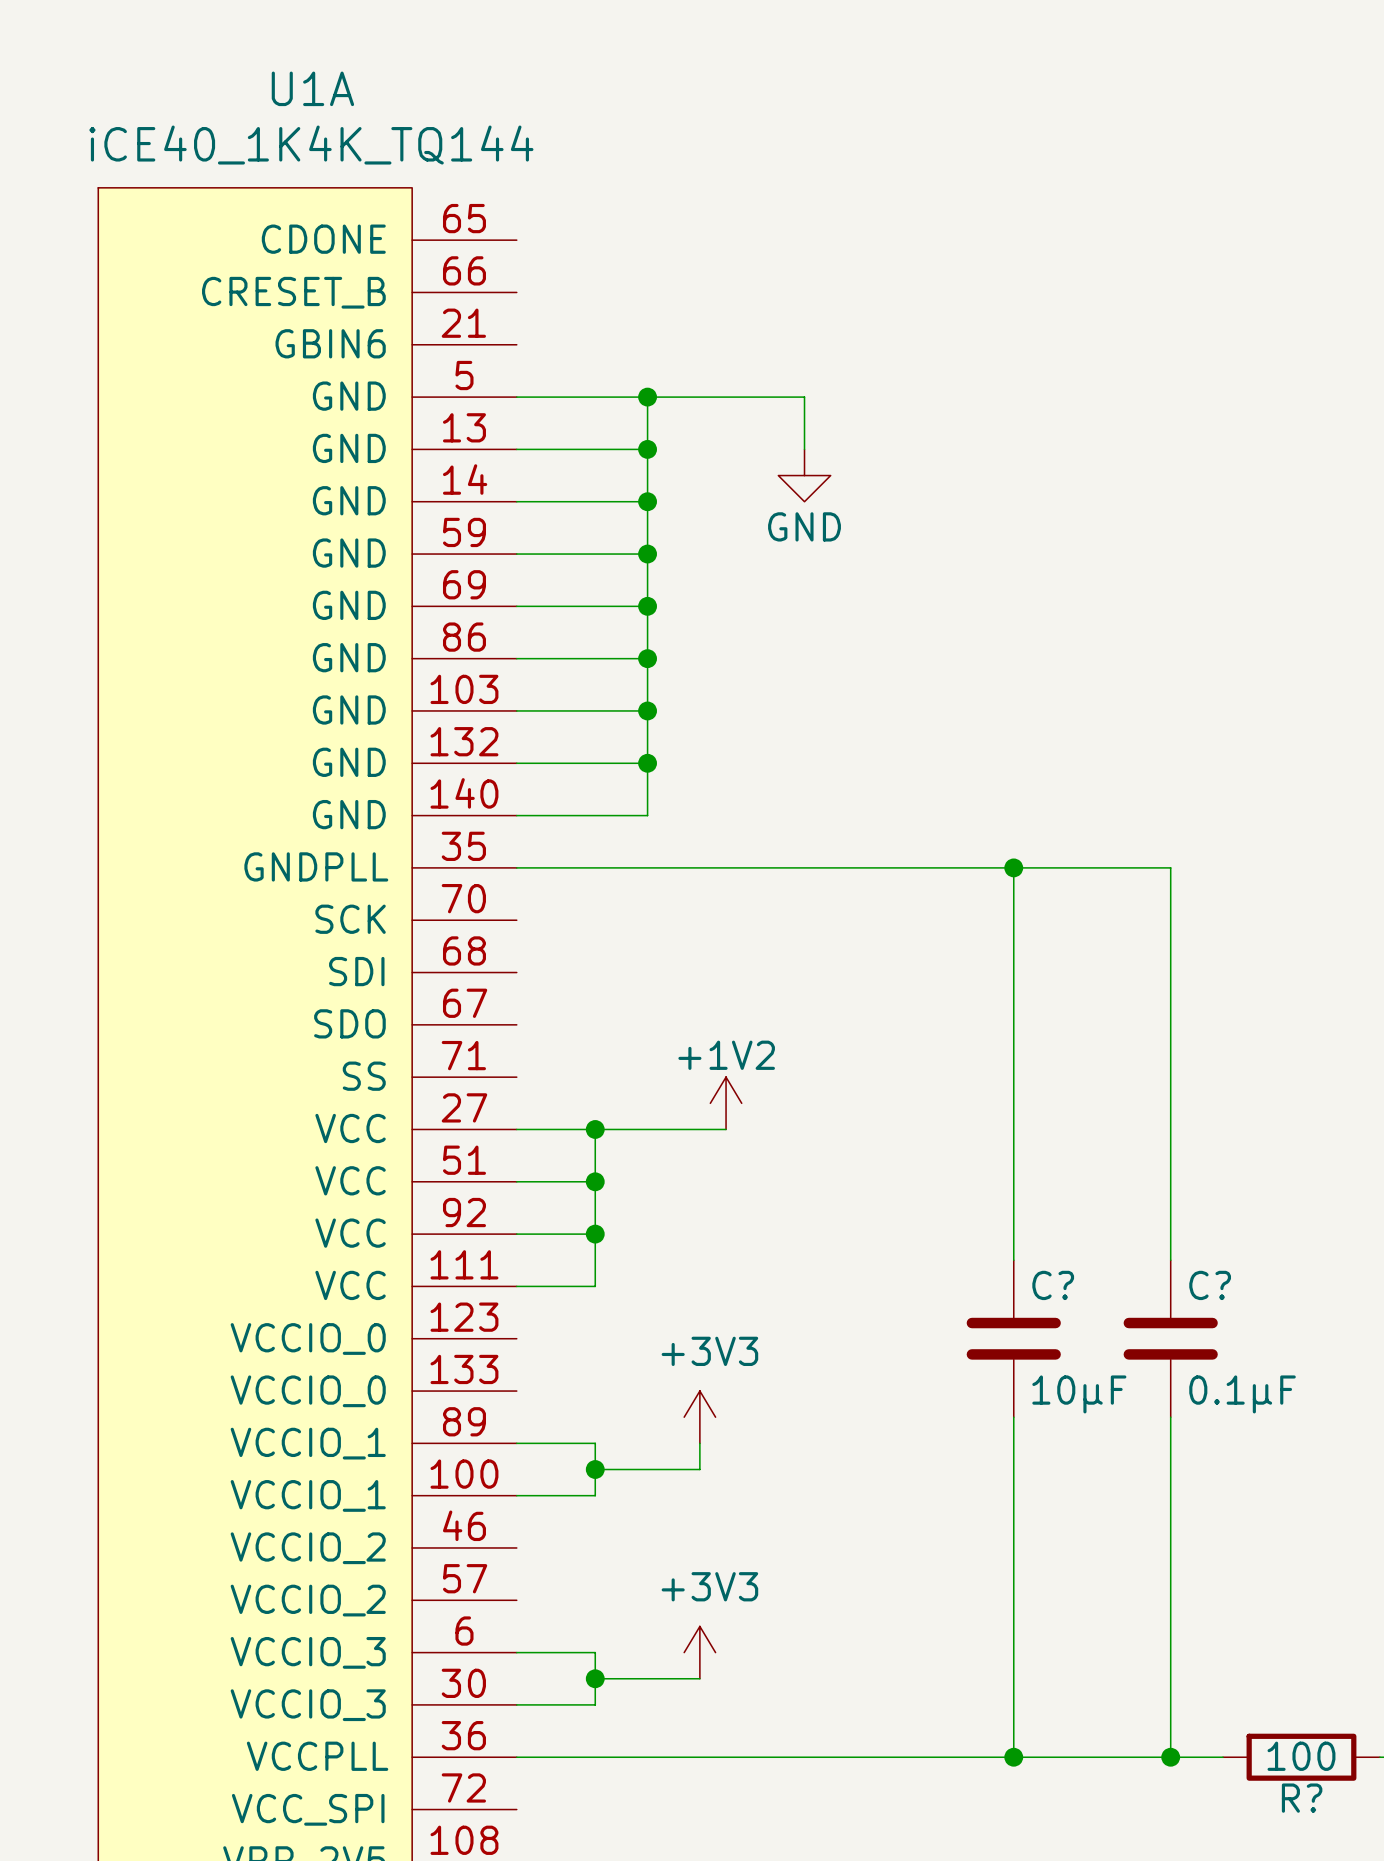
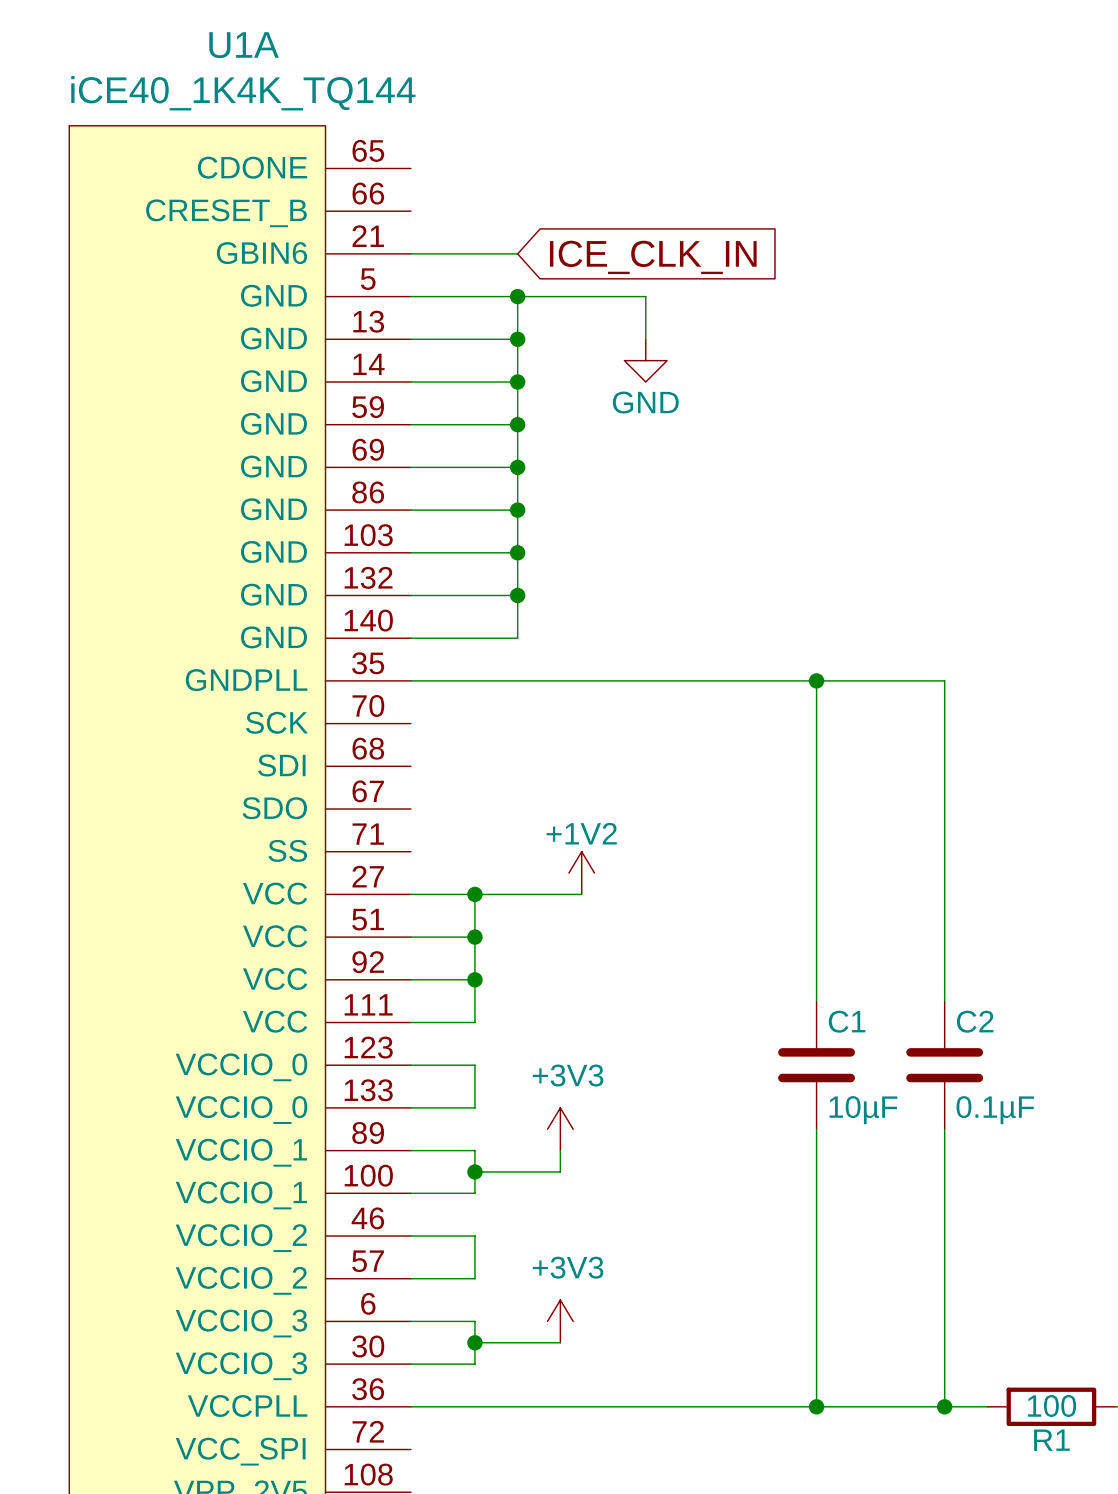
wire: none -> (410, 253) (517, 253)
global label: none -> ICE_CLK_IN (653, 257)
C? name: C? (1053, 1285) -> C1 (847, 1021)
C? name: C? (1210, 1285) -> C2 (975, 1021)
wire: none -> (410, 1065) (474, 1065) (474, 1107) (410, 1107)
wire: none -> (410, 1236) (474, 1236) (474, 1278) (410, 1278)
R? name: R? (1302, 1798) -> R1 (1051, 1440)

